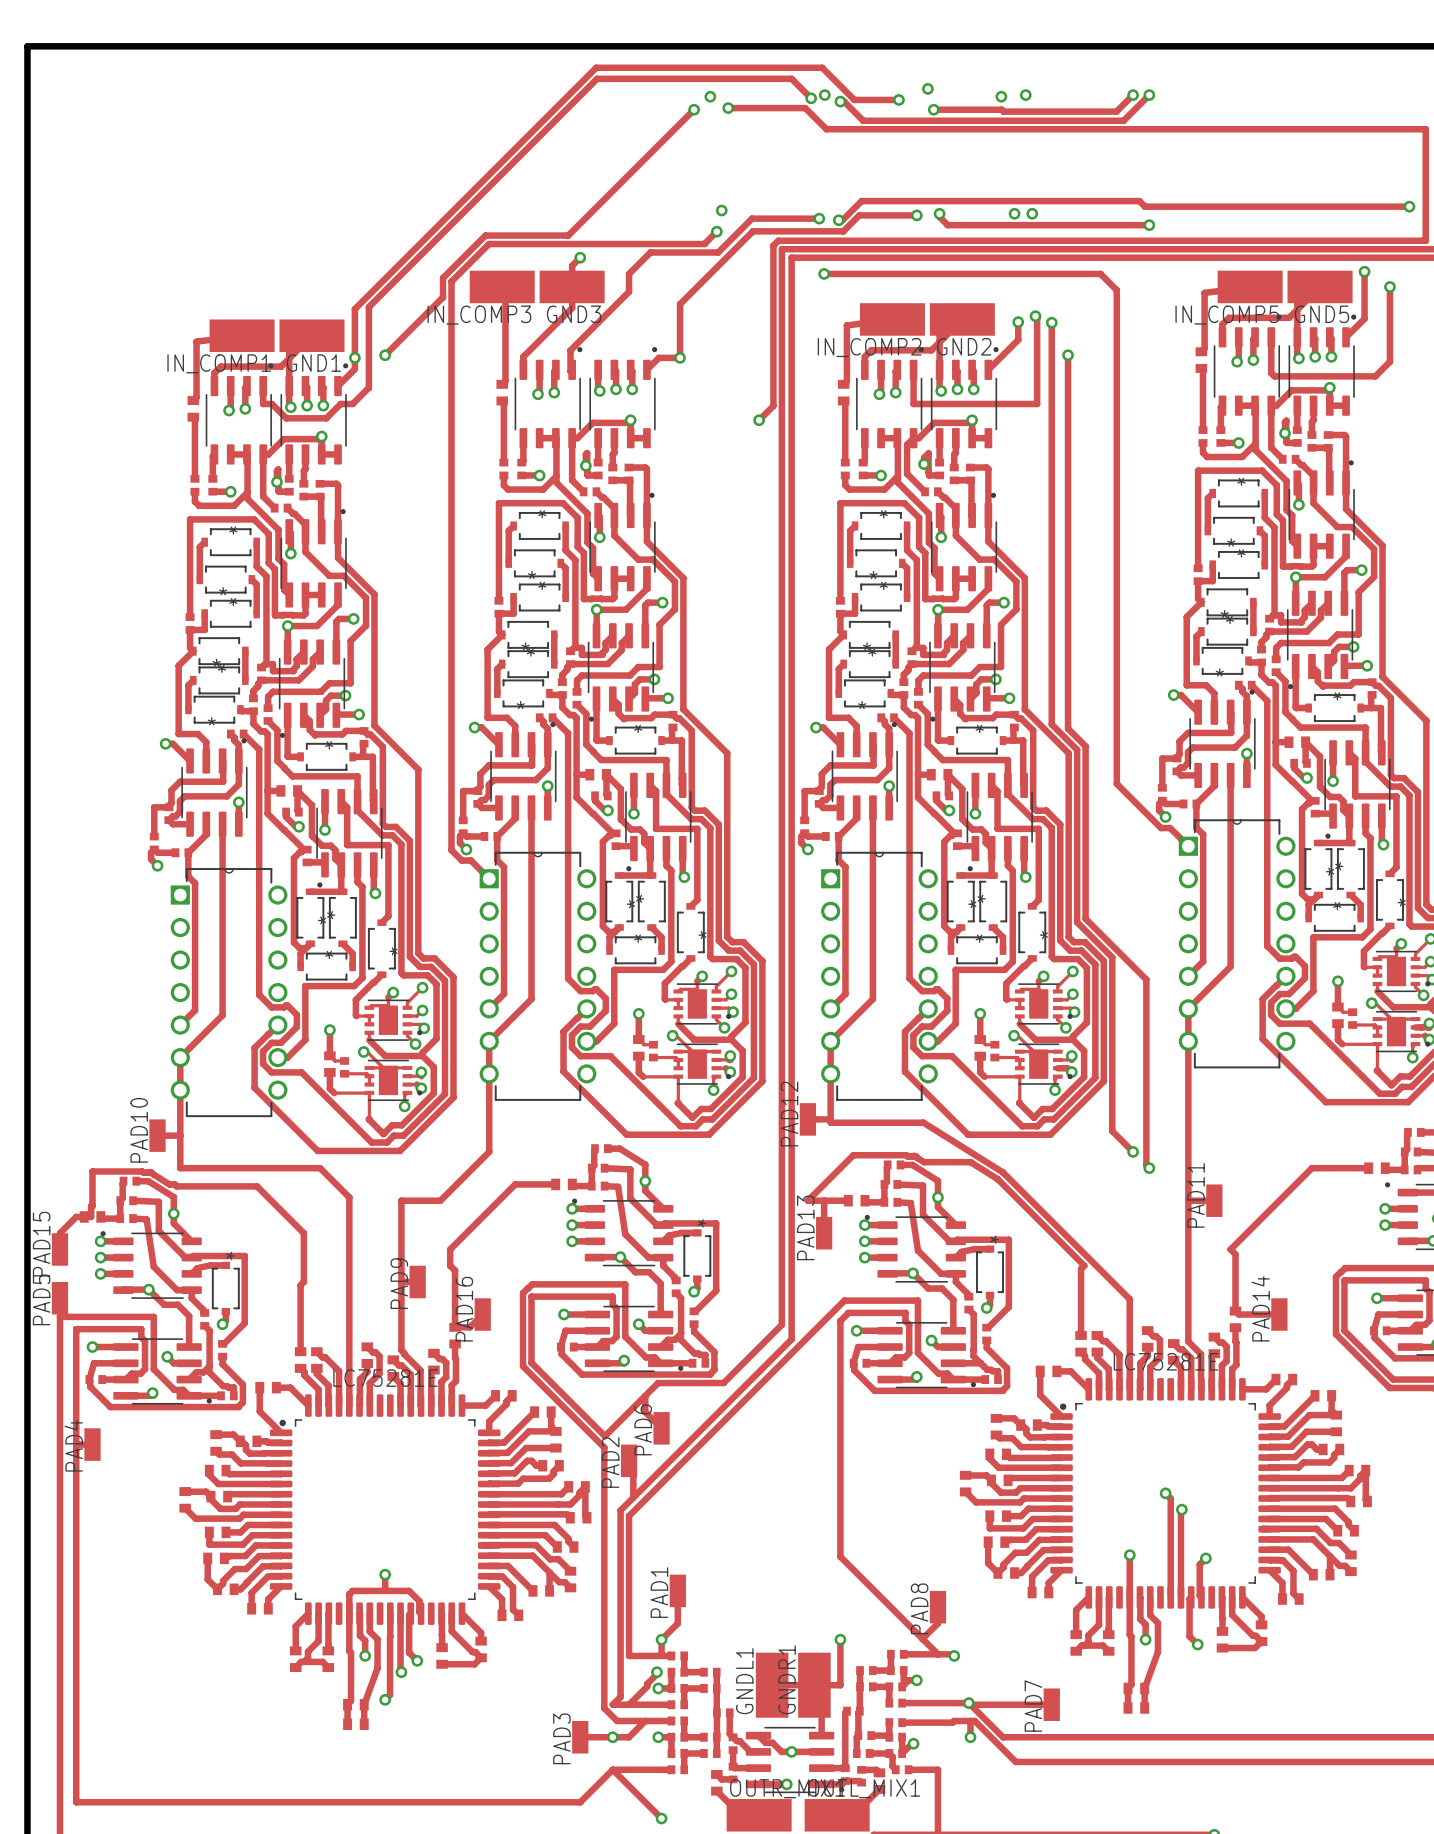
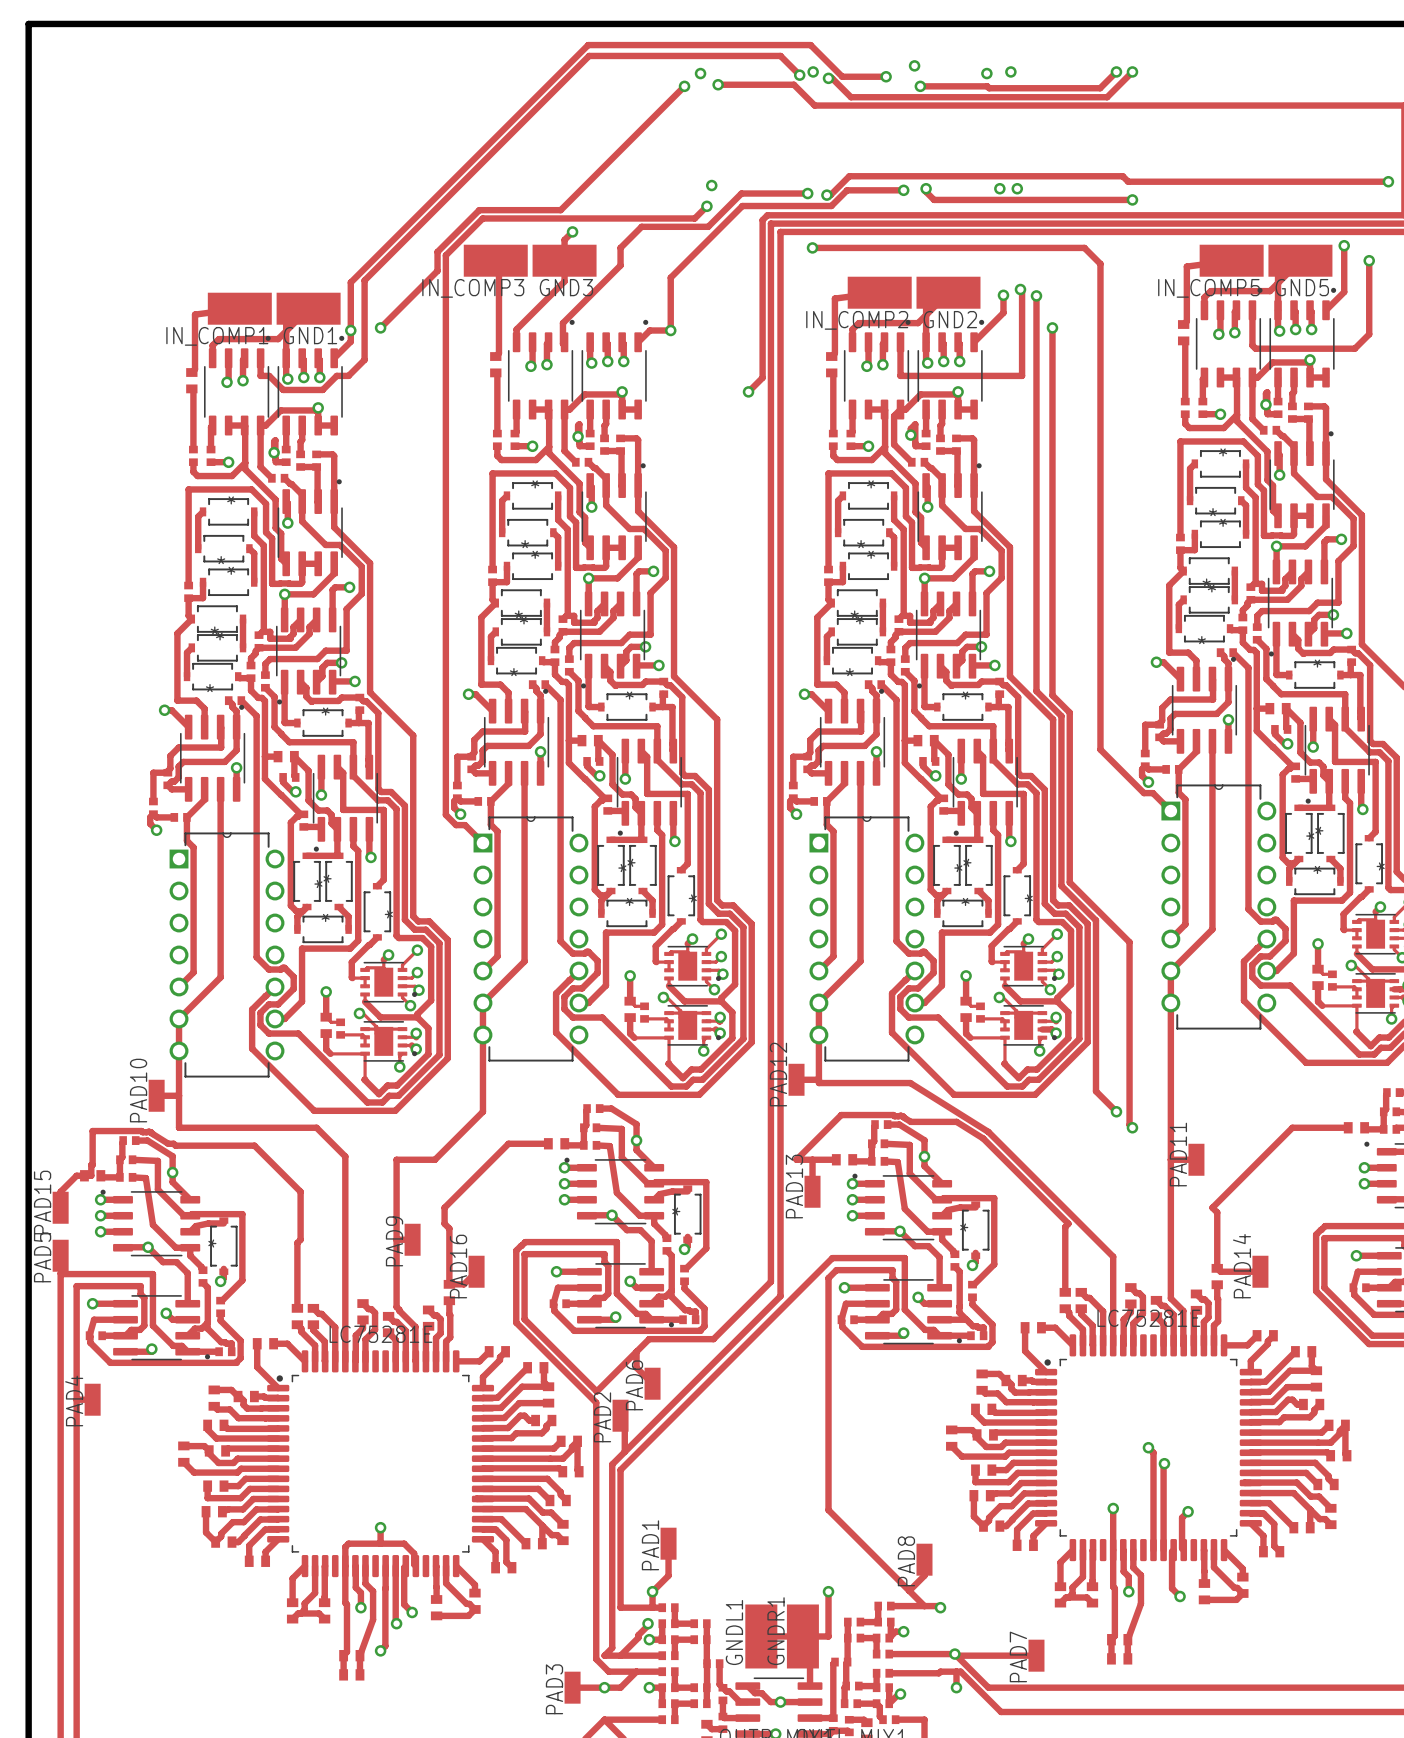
part footprint: [683, 1229, 712, 1283] -> [673, 1185, 702, 1243]
part footprint: [976, 1245, 1004, 1299] -> [961, 1201, 990, 1259]
part footprint: [211, 1261, 240, 1316] -> [210, 1217, 238, 1275]

